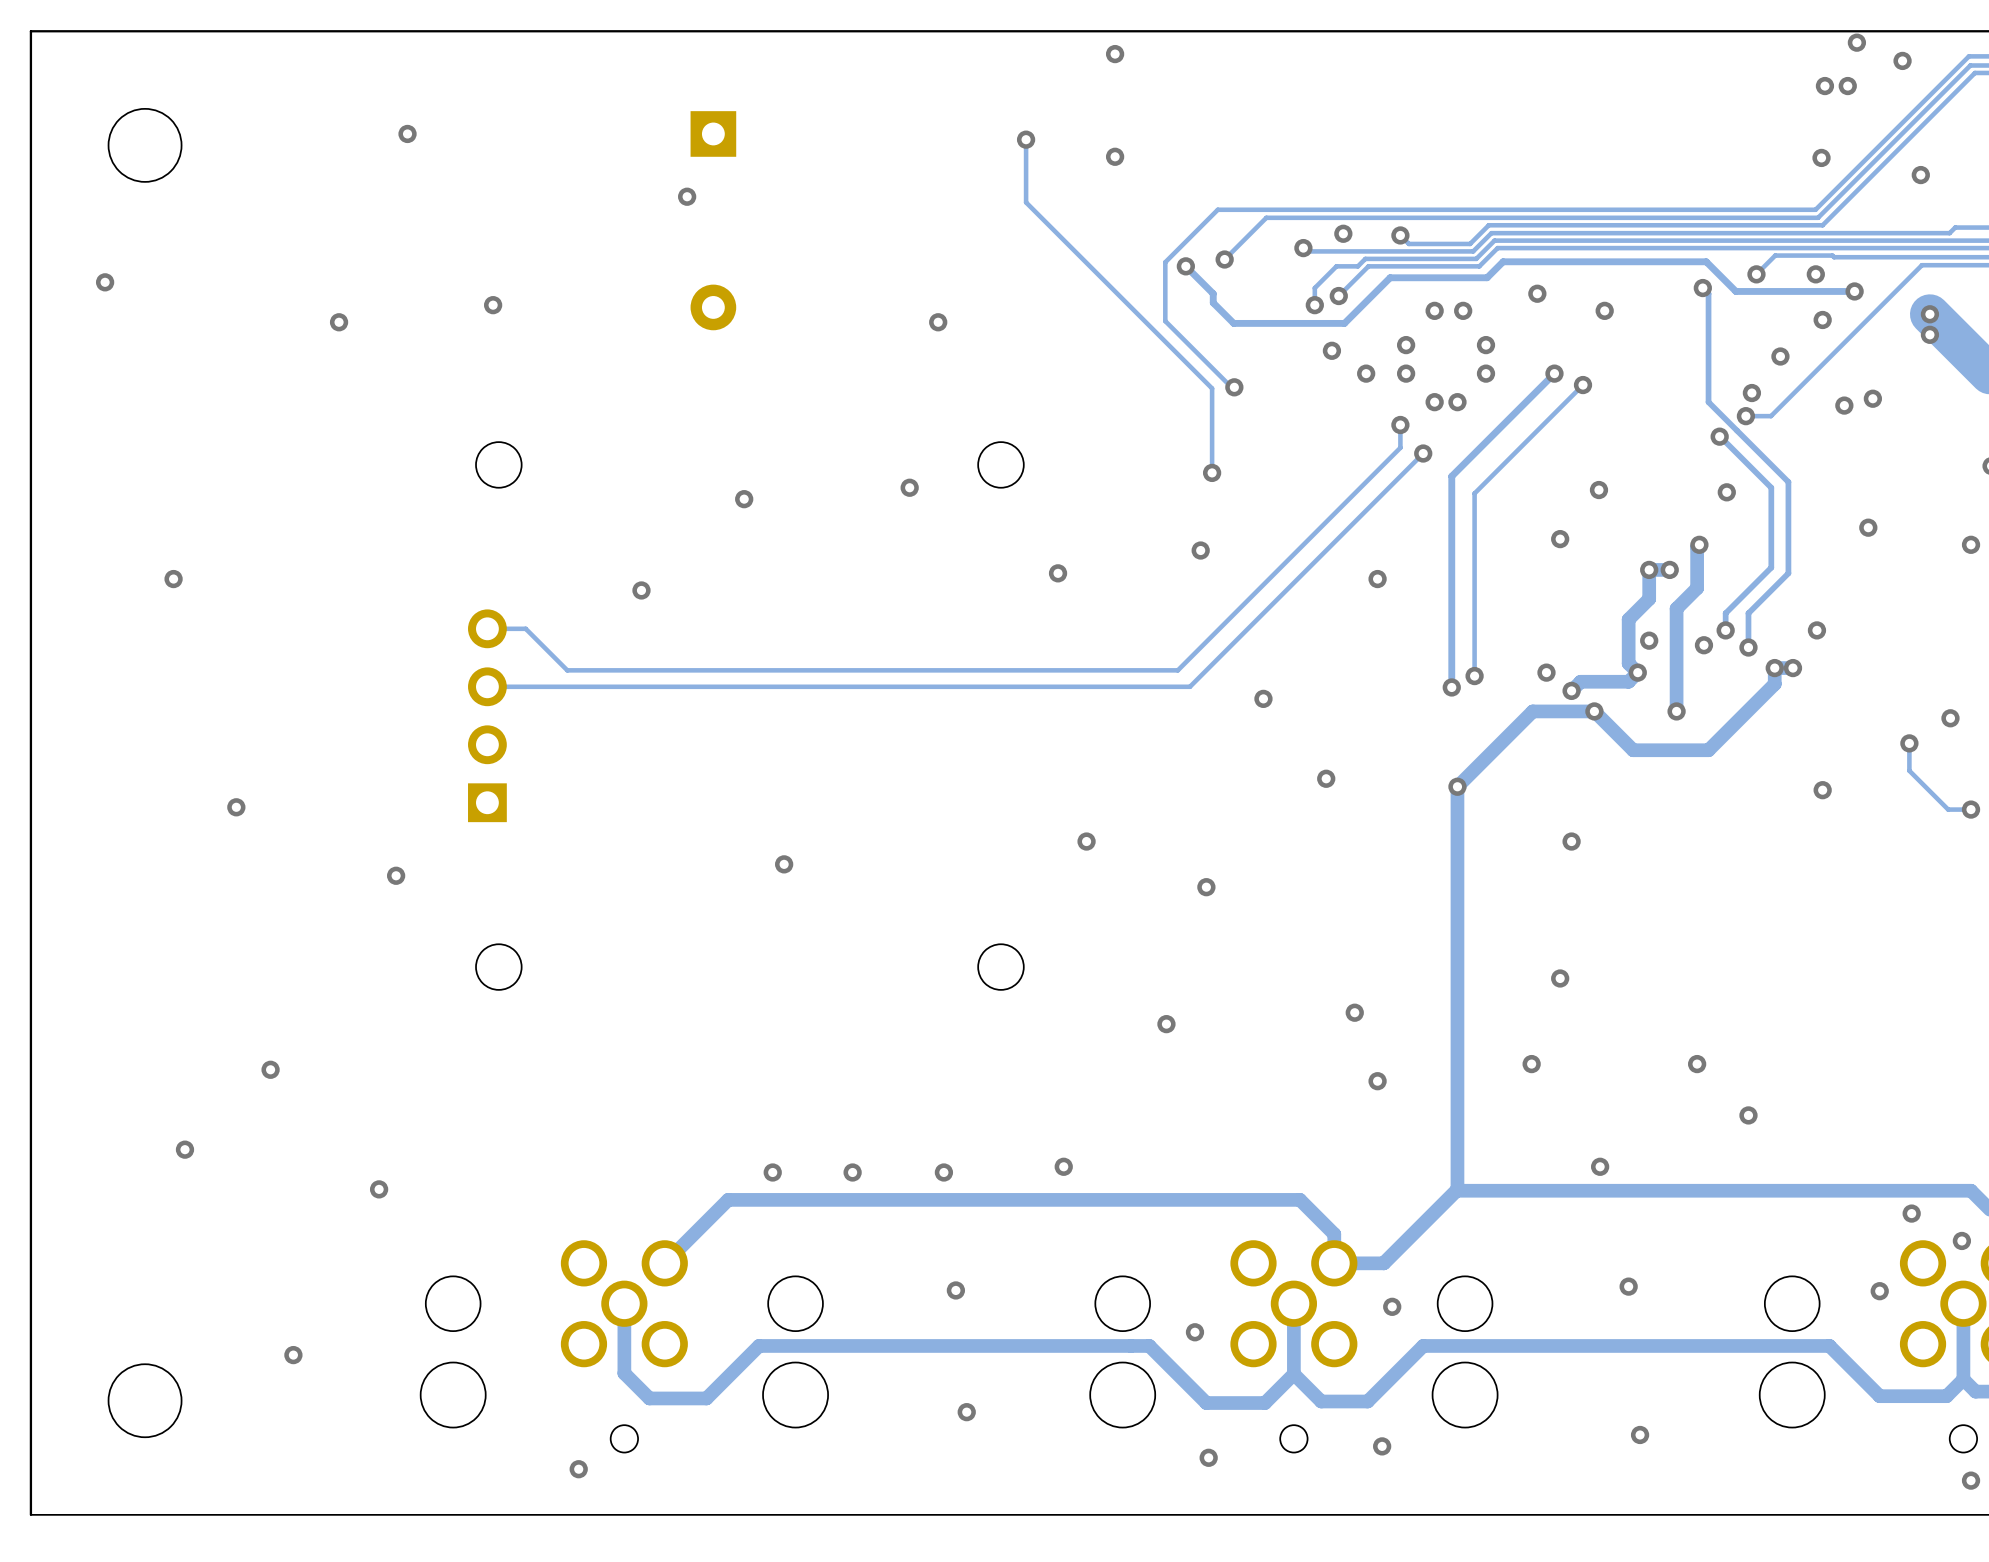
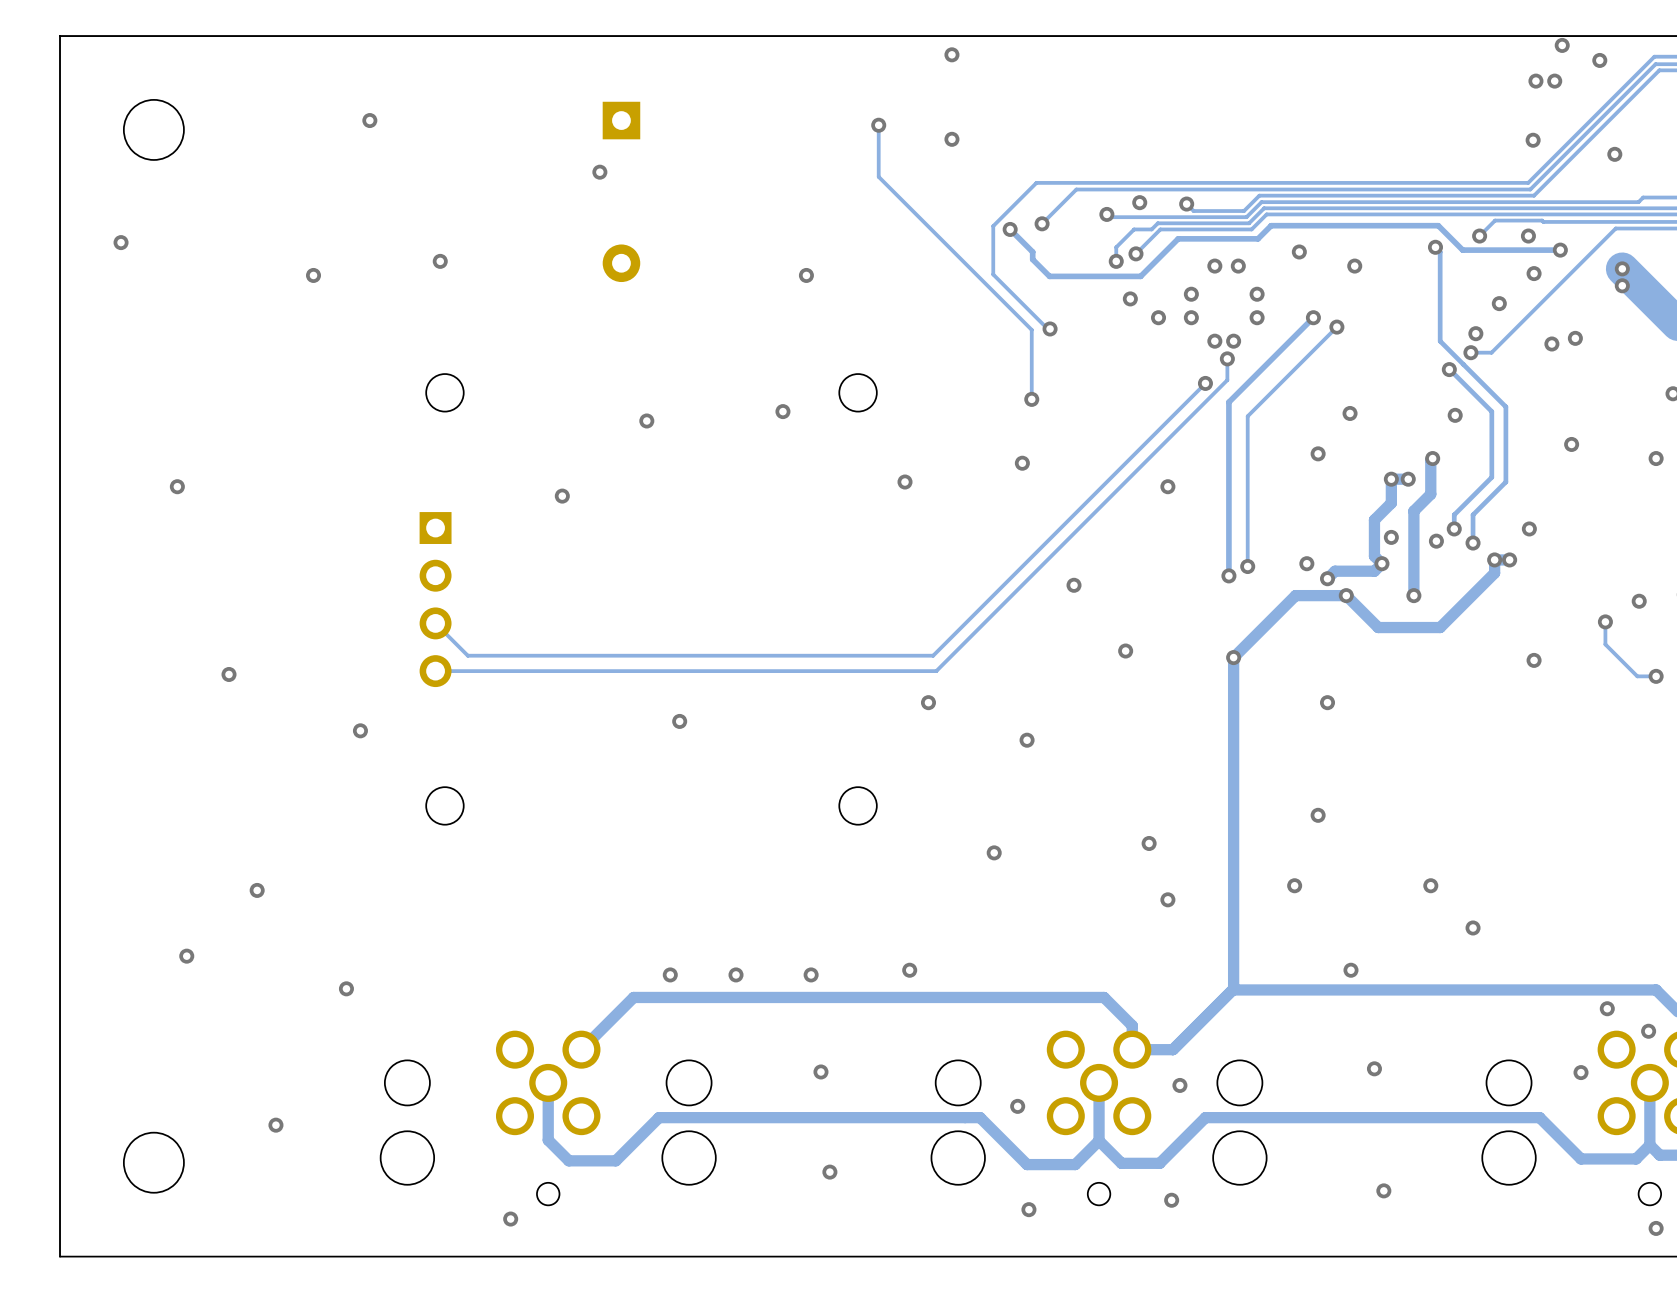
track: none -> (1227, 358) (1227, 380) (936, 671) (435, 671)
track: (1400, 424) (1400, 447) (1177, 670) (567, 670) (525, 628) (487, 628) -> none
via position: (1400, 424) -> (1227, 358)
track: (1189, 686) (487, 686) -> (1013, 575) (933, 655) (467, 655) (435, 623)
part rotation: 0° (487, 715) -> 180° (435, 599)

